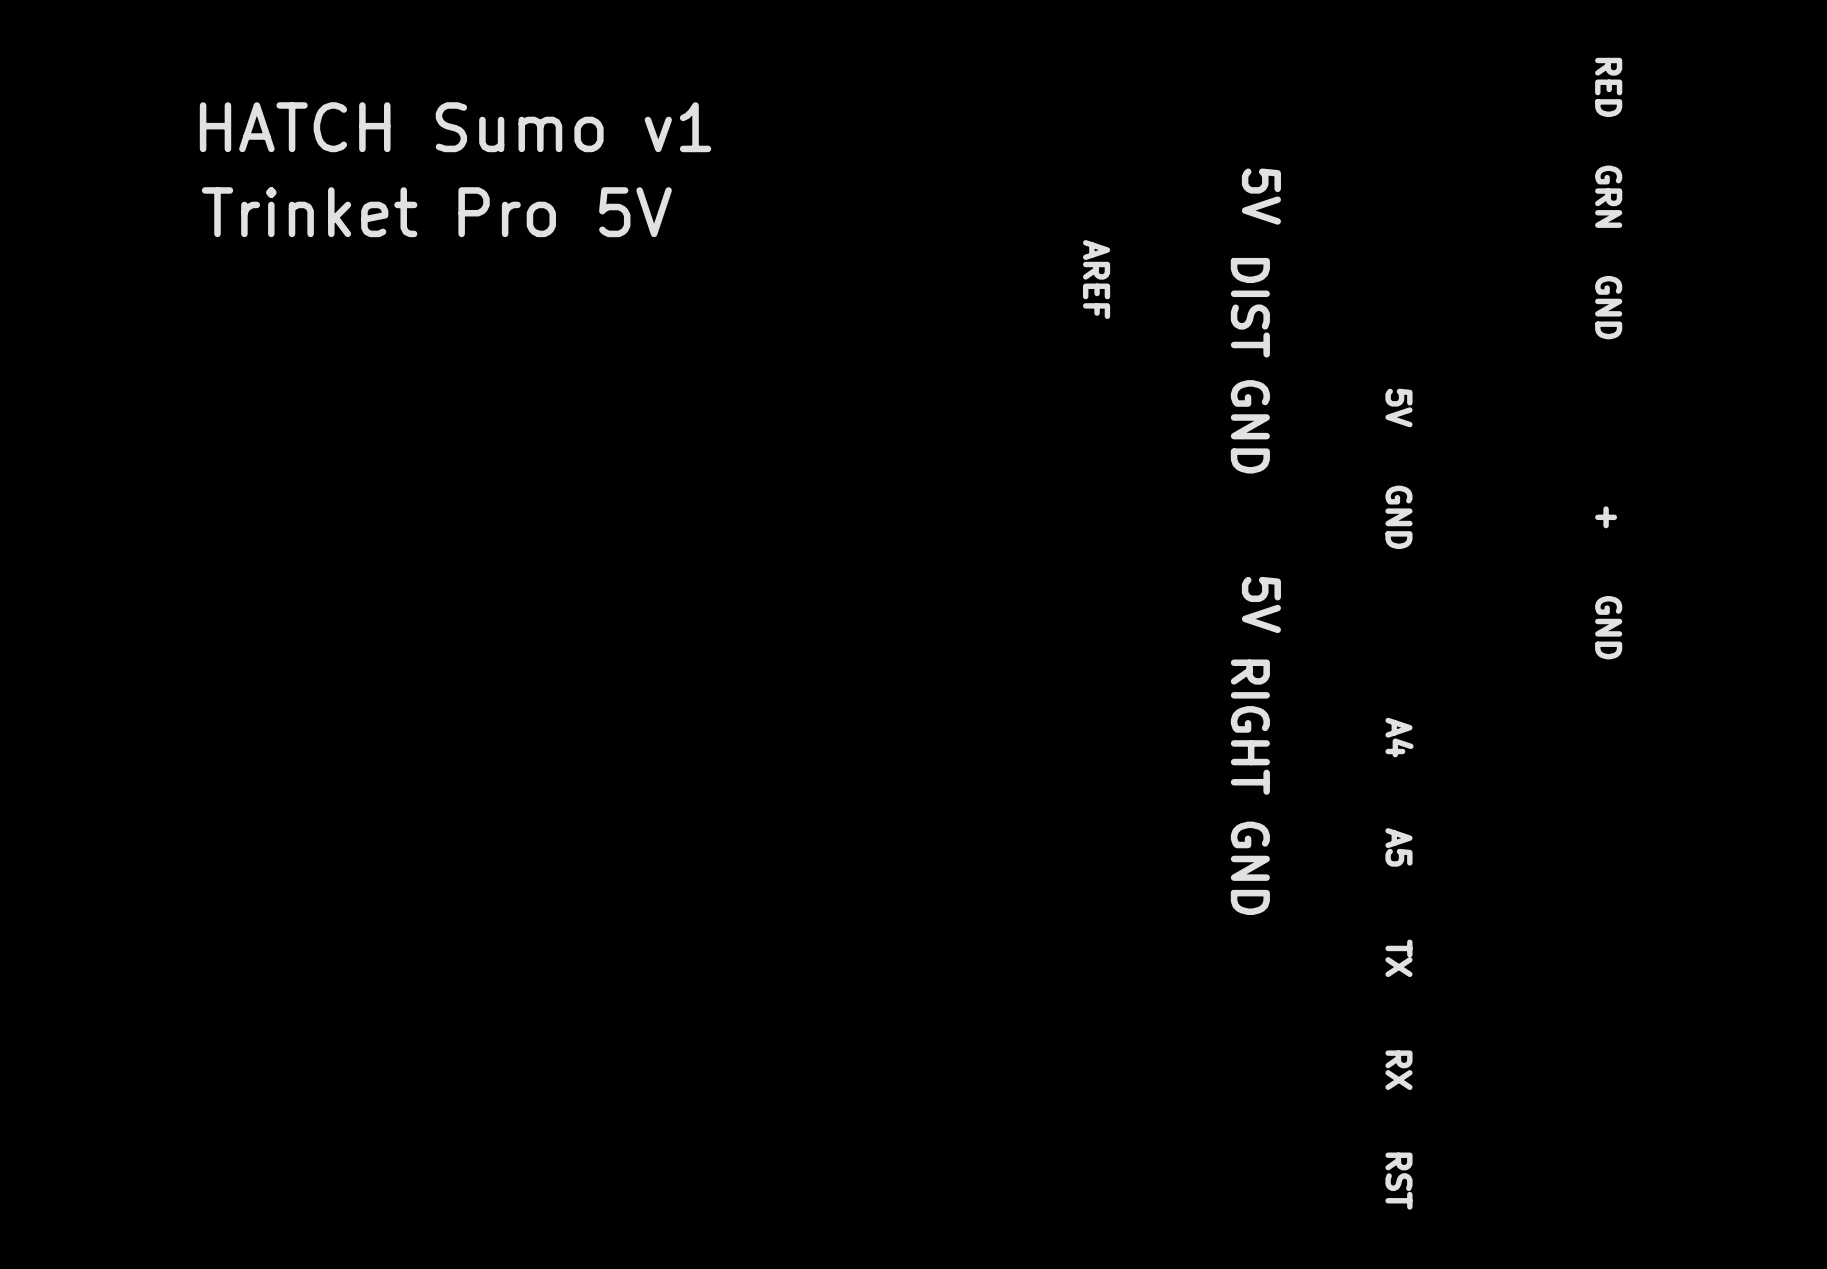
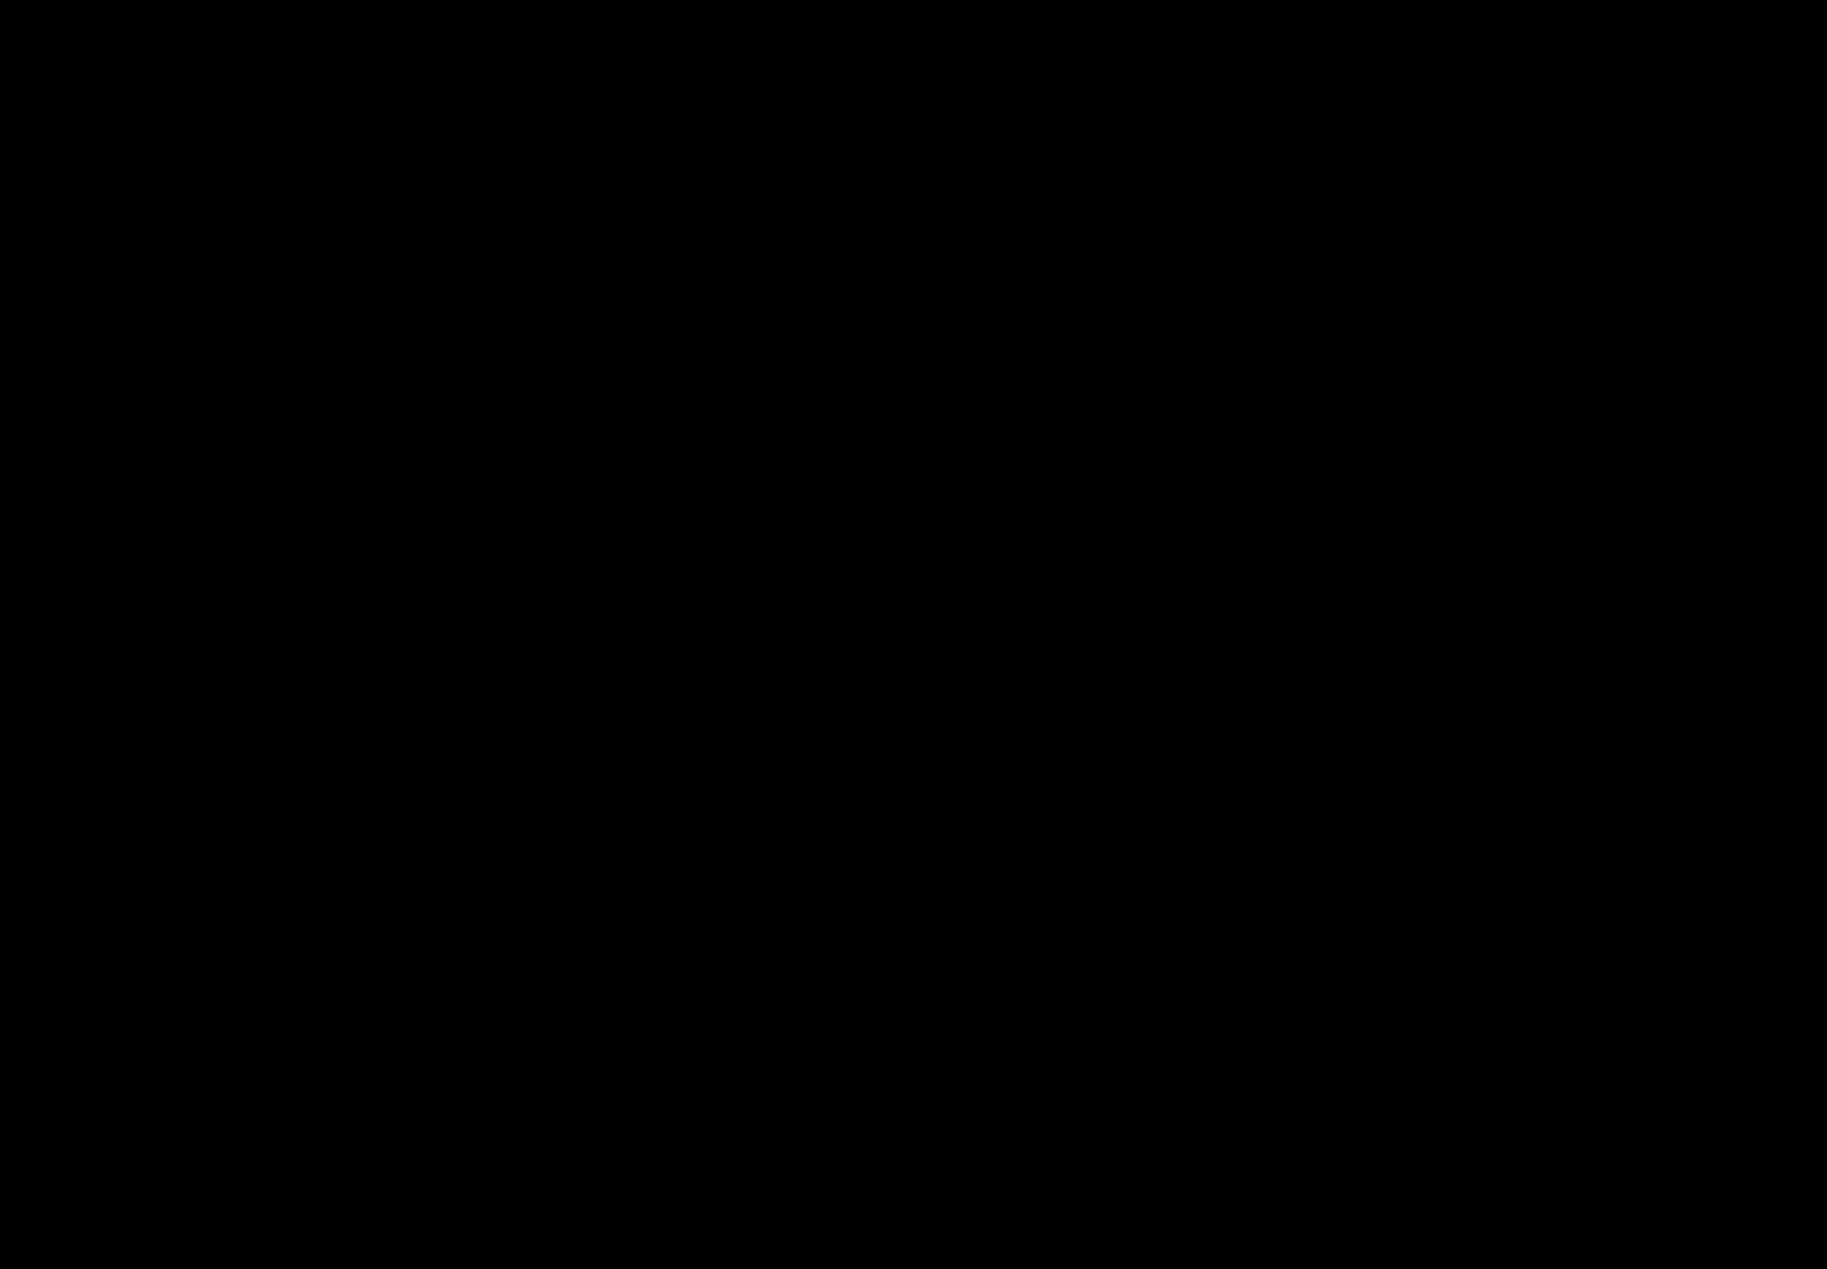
text: RED (1608, 87) -> none
text: HATCH Sumo v1 (455, 127) -> none
text: 5V (1261, 196) -> none
text: GRN (1608, 196) -> none
text: Trinket Pro 5V (436, 212) -> none
text: AREF (1096, 279) -> none
text: DIST (1250, 307) -> none
text: GND (1608, 307) -> none
text: 5V (1398, 407) -> none
text: GND (1250, 426) -> none
text: GND (1398, 517) -> none
text: + (1606, 517) -> none
text: 5V (1261, 604) -> none
text: GND (1608, 627) -> none
text: RIGHT (1250, 727) -> none
text: A4 (1399, 737) -> none
text: A5 (1398, 847) -> none
text: GND (1250, 868) -> none
text: TX (1398, 958) -> none
text: RX (1398, 1070) -> none
text: RST (1398, 1181) -> none

